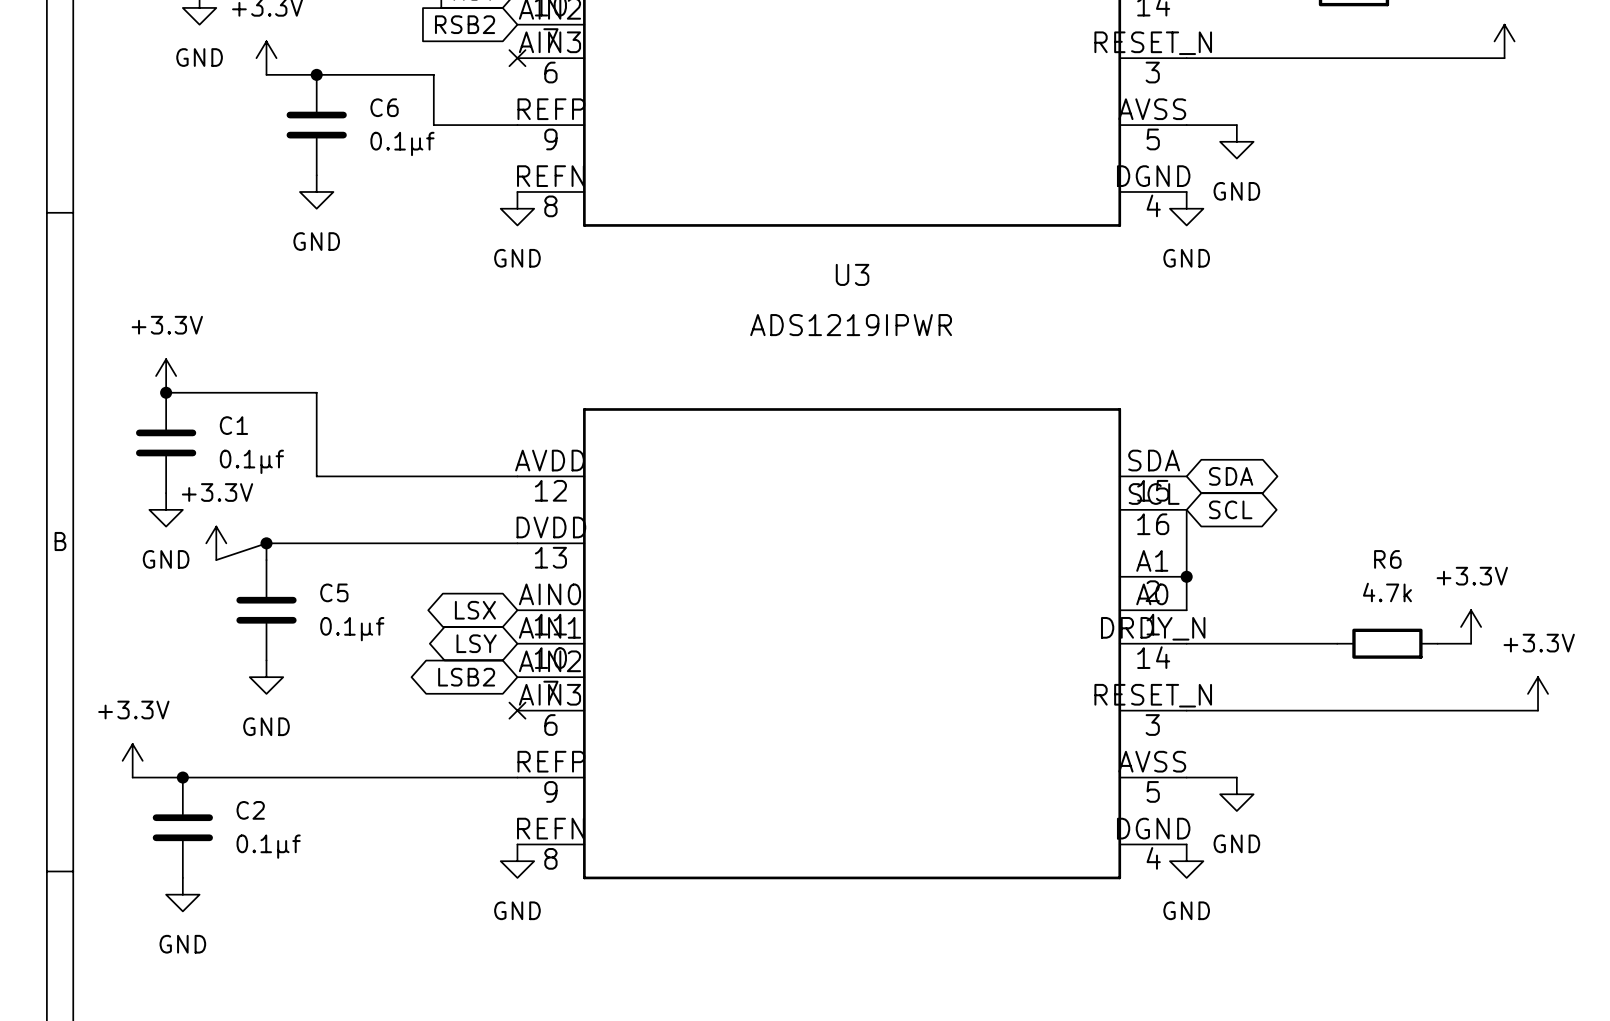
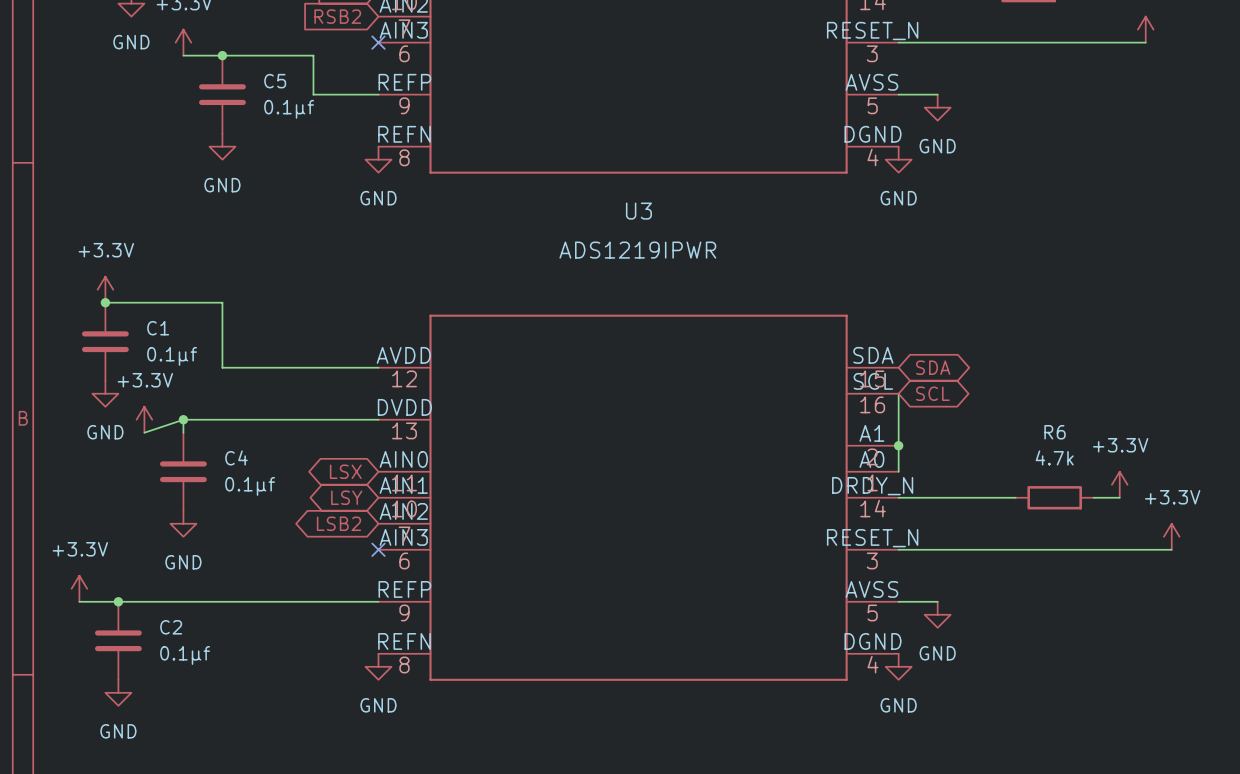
C6 name: C6 (384, 107) -> C5 (275, 81)
C5 name: C5 (334, 592) -> C4 (236, 457)

